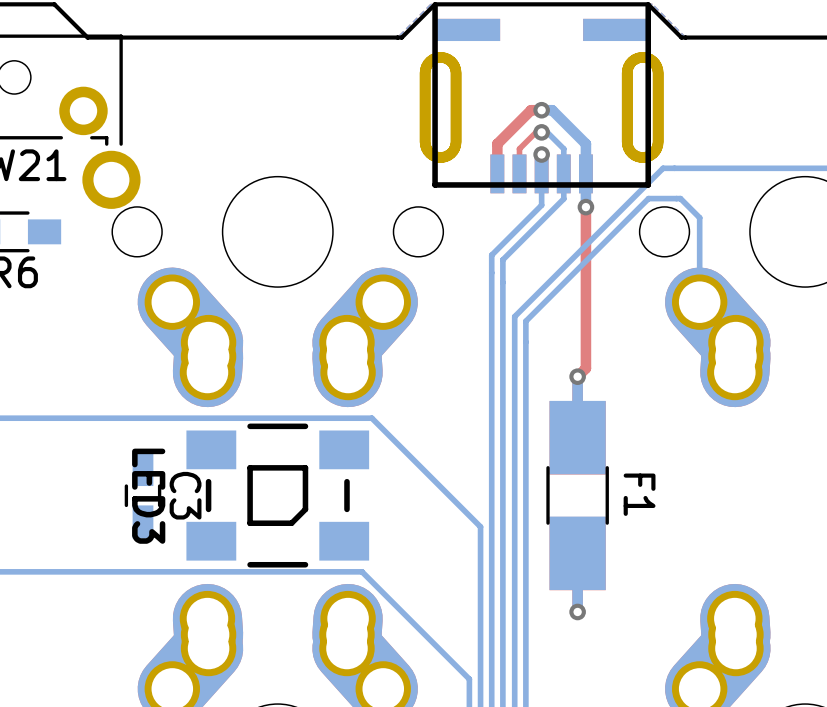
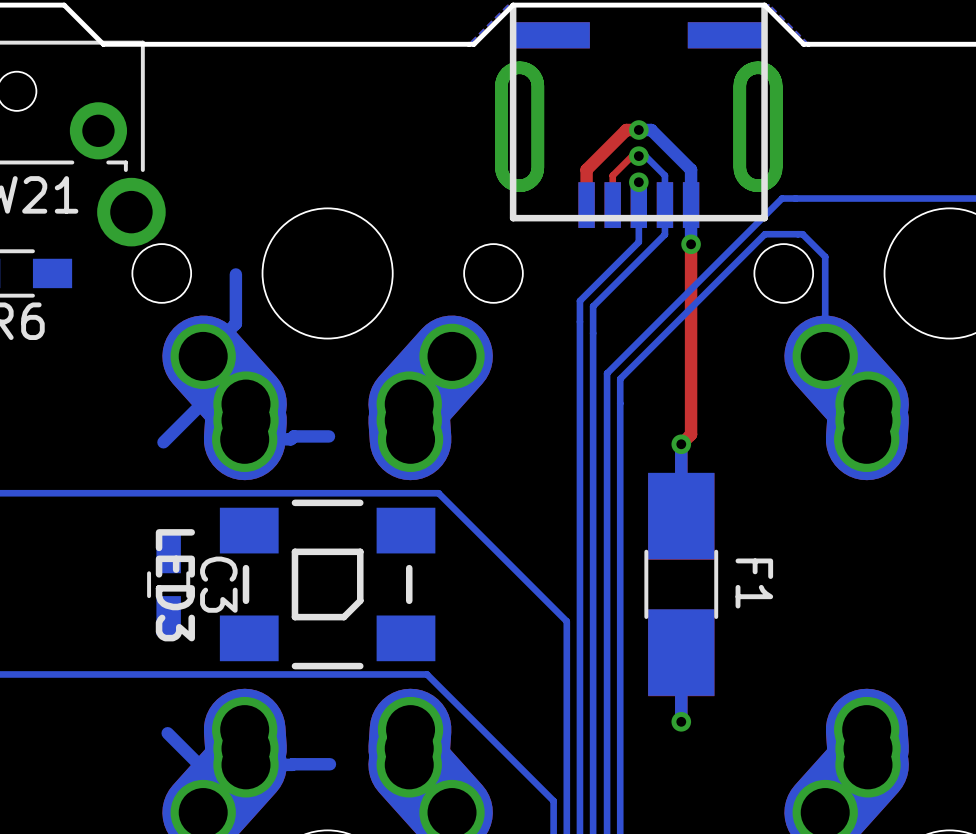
bottom track: none -> (235, 274) (235, 323) (203, 356) (203, 402) (163, 442)
bottom track: none -> (328, 436) (293, 436) (290, 439) (244, 439)
bottom track: none -> (167, 733) (199, 764) (329, 764)

